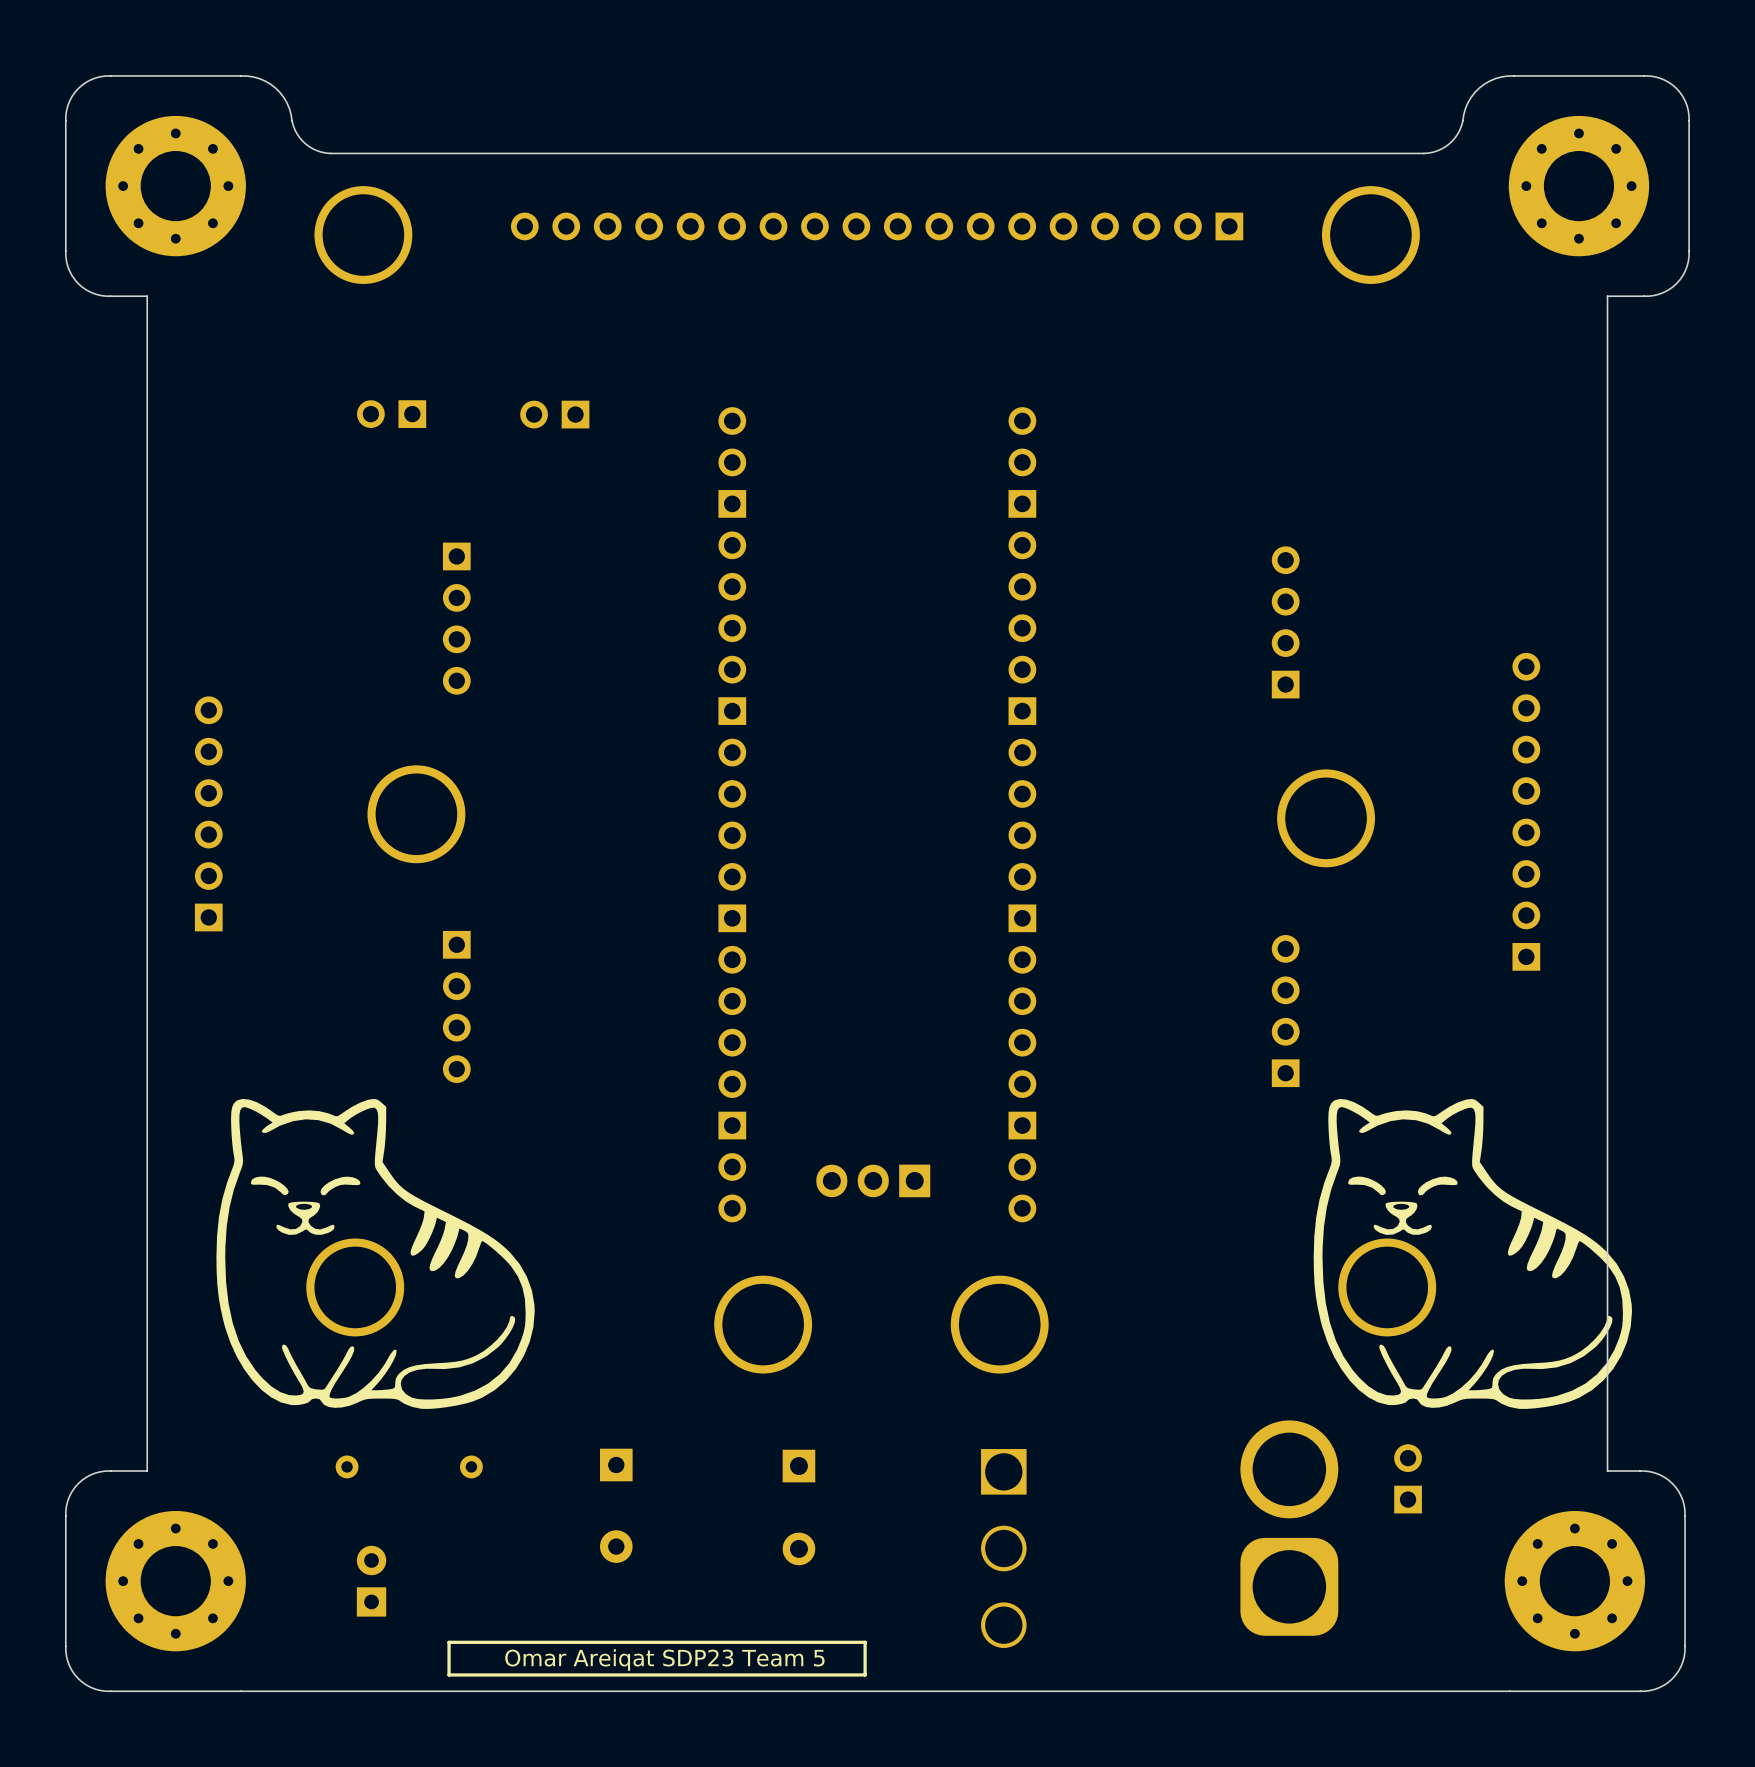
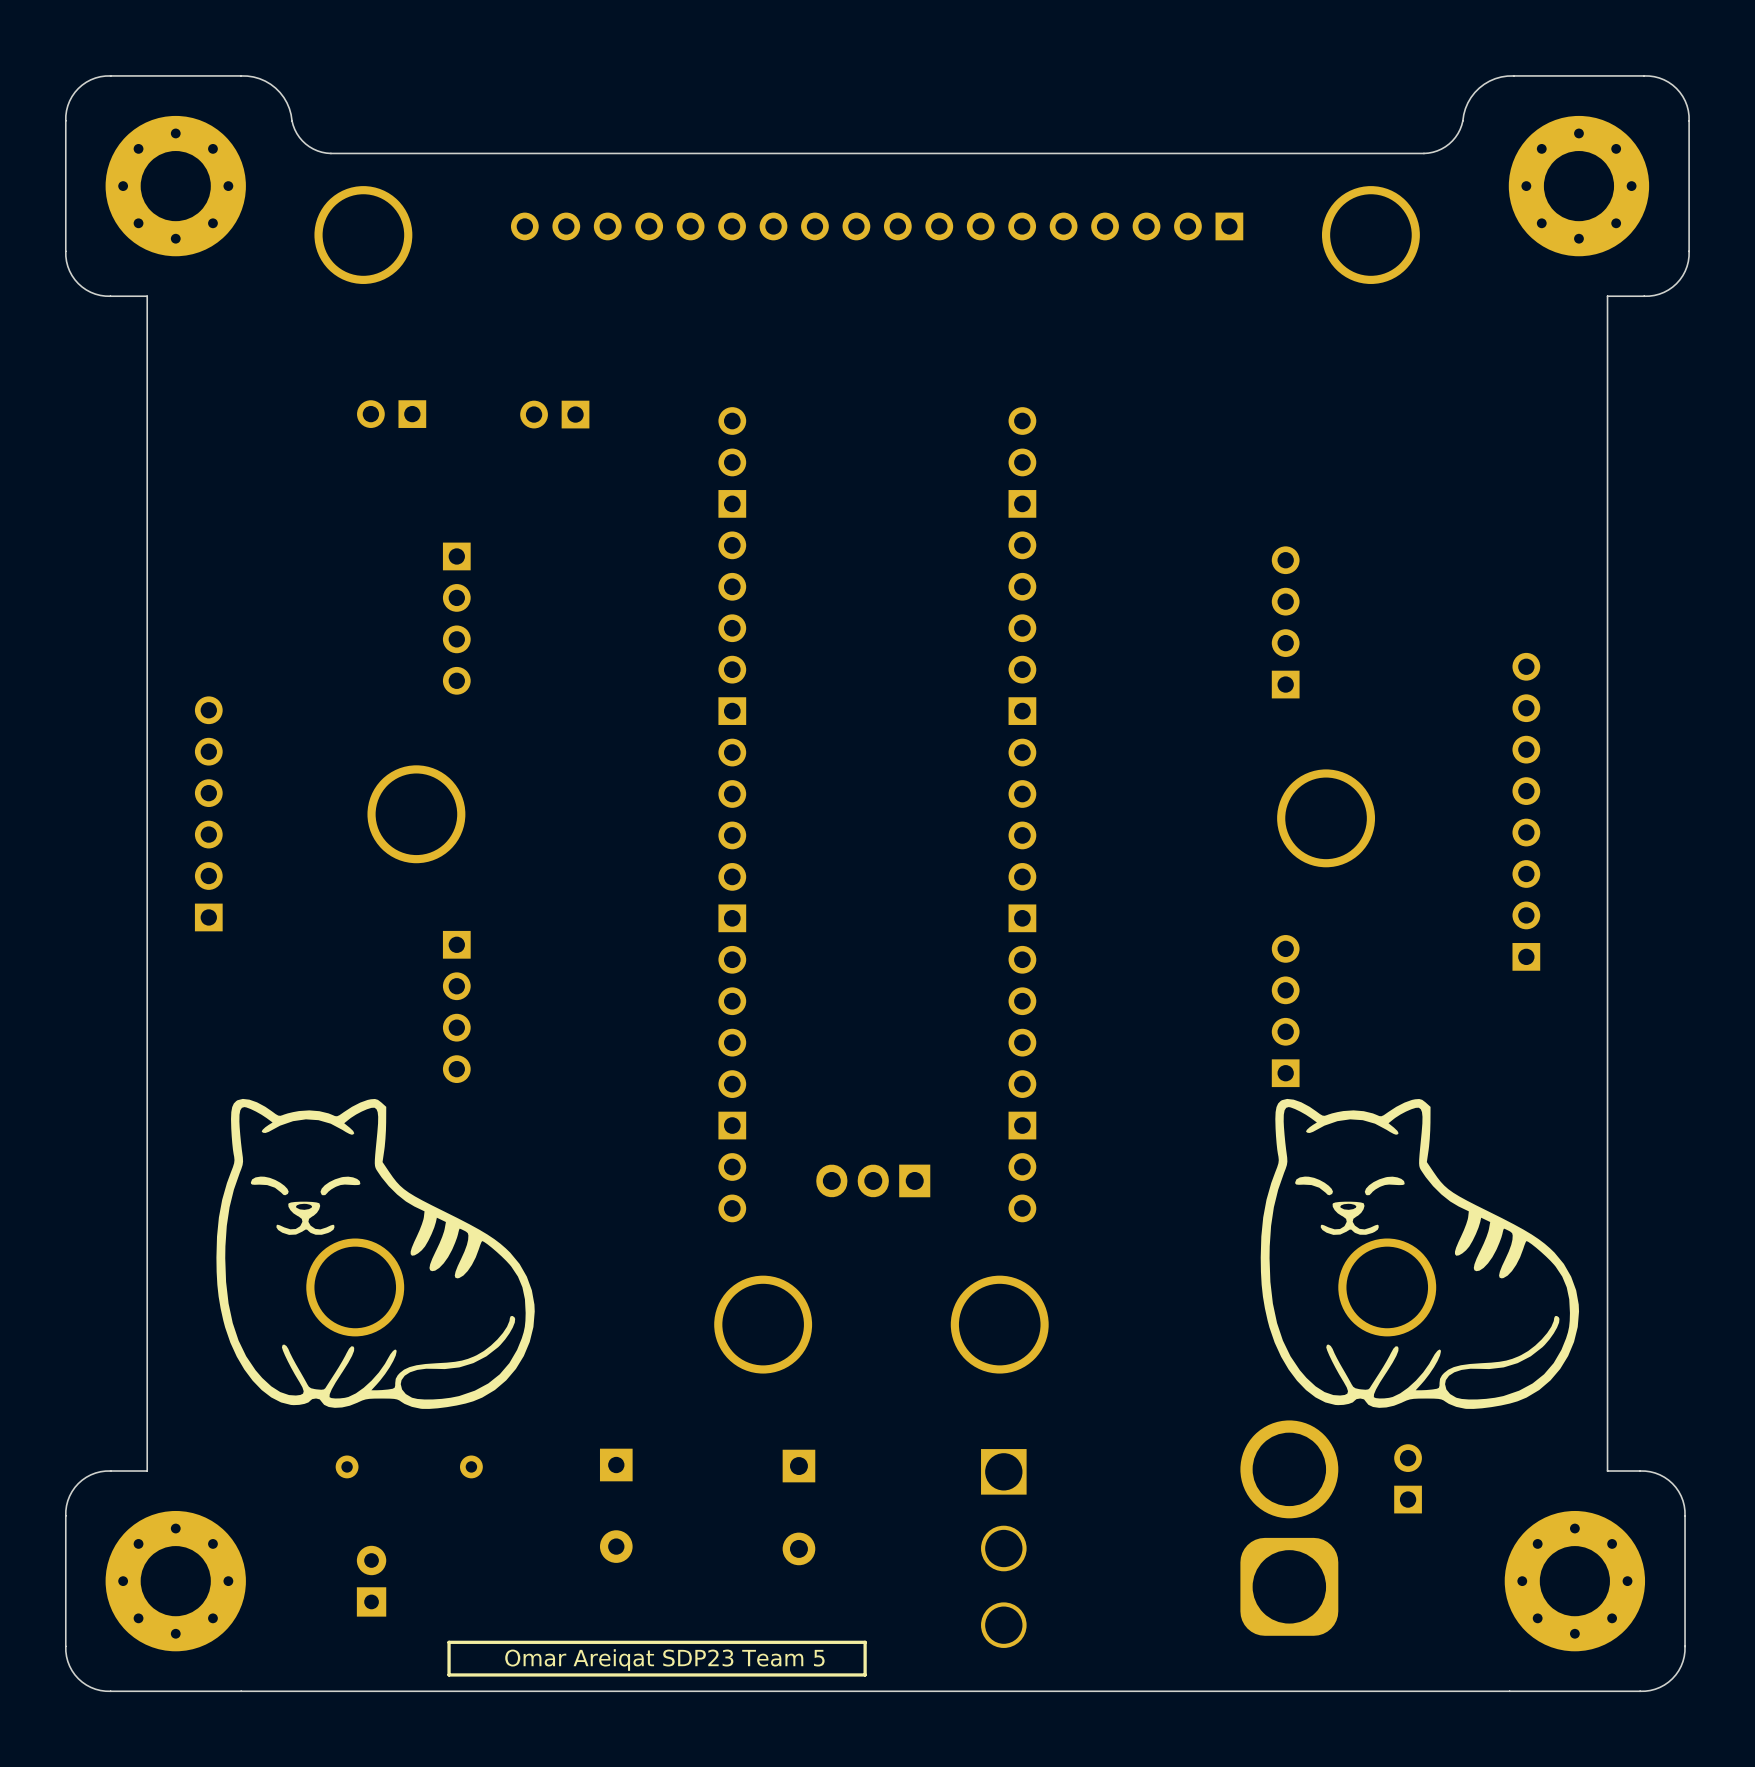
drawing position: (1472, 1253) -> (1419, 1253)

